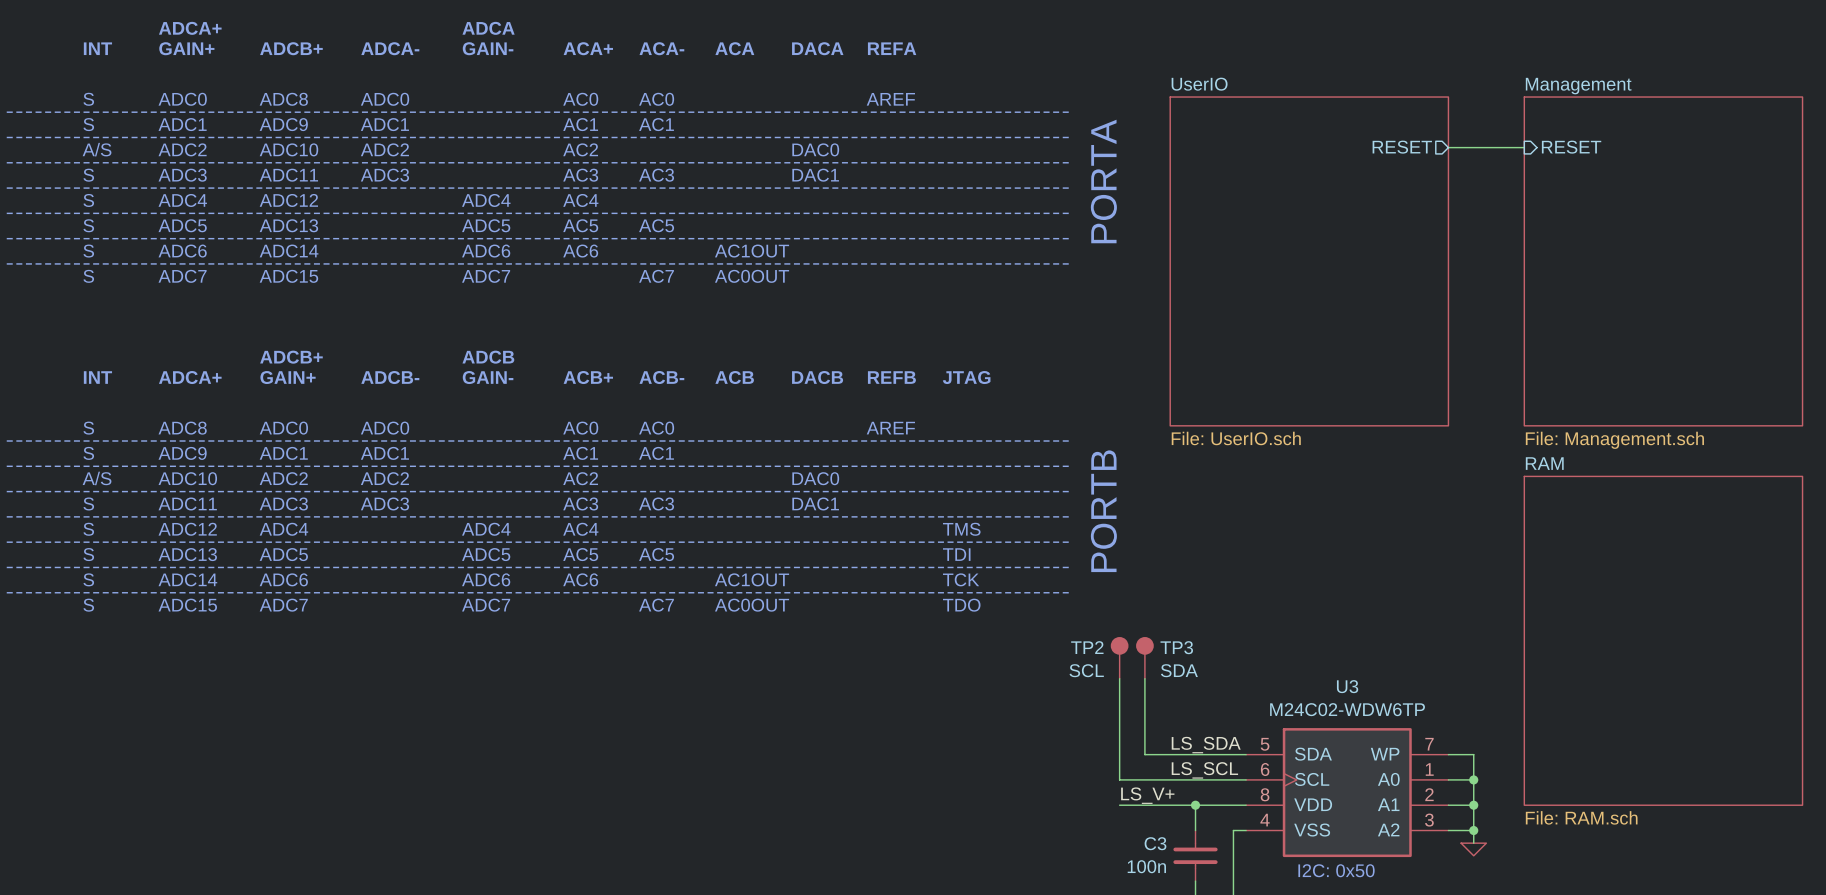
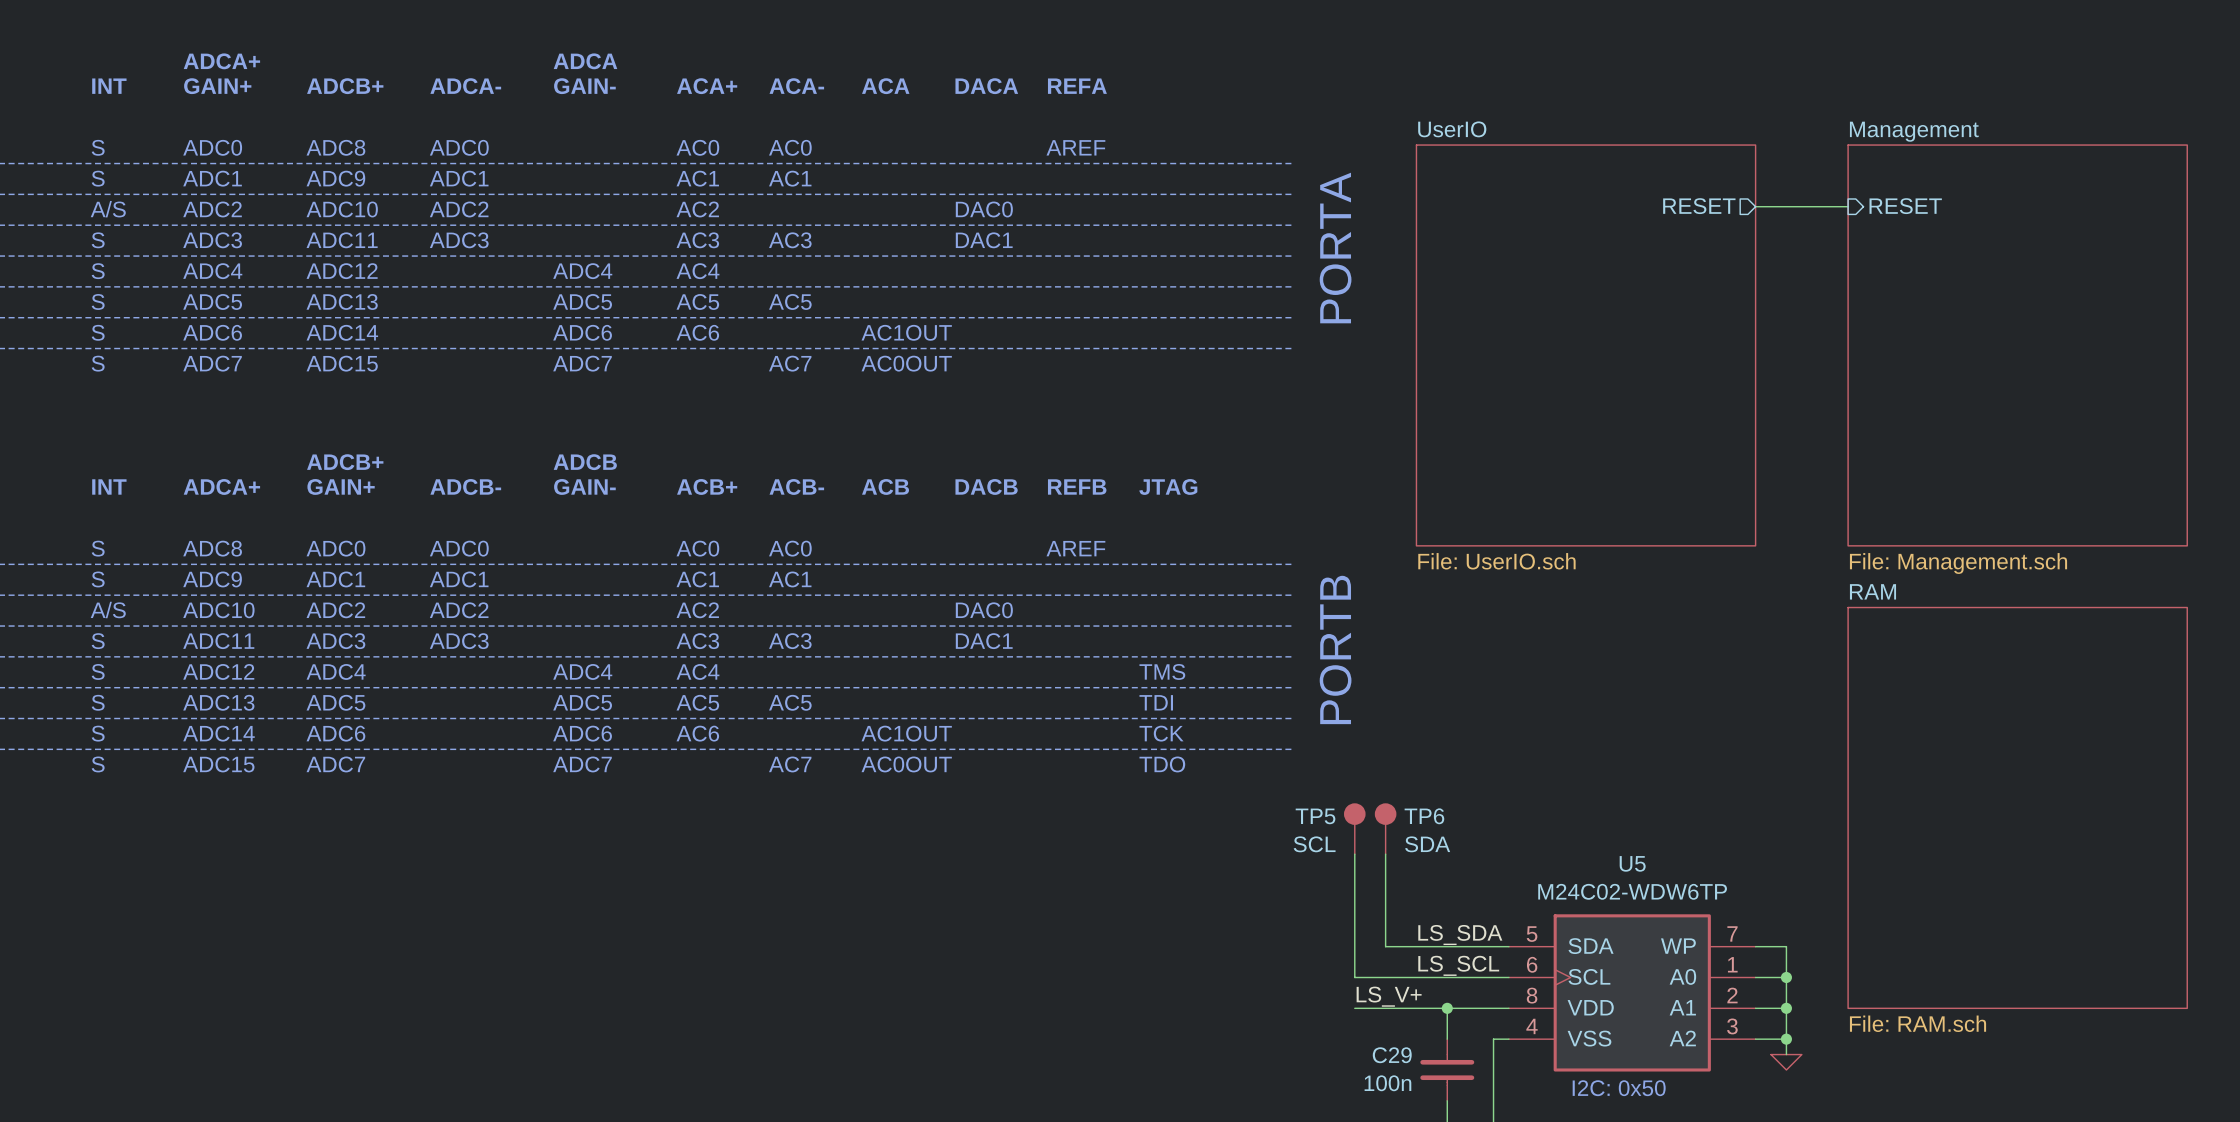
TP2 name: TP2 (1087, 647) -> TP5 (1315, 816)
TP3 name: TP3 (1176, 647) -> TP6 (1424, 816)
U3 name: U3 (1347, 686) -> U5 (1632, 863)
C3 name: C3 (1155, 843) -> C29 (1392, 1055)

